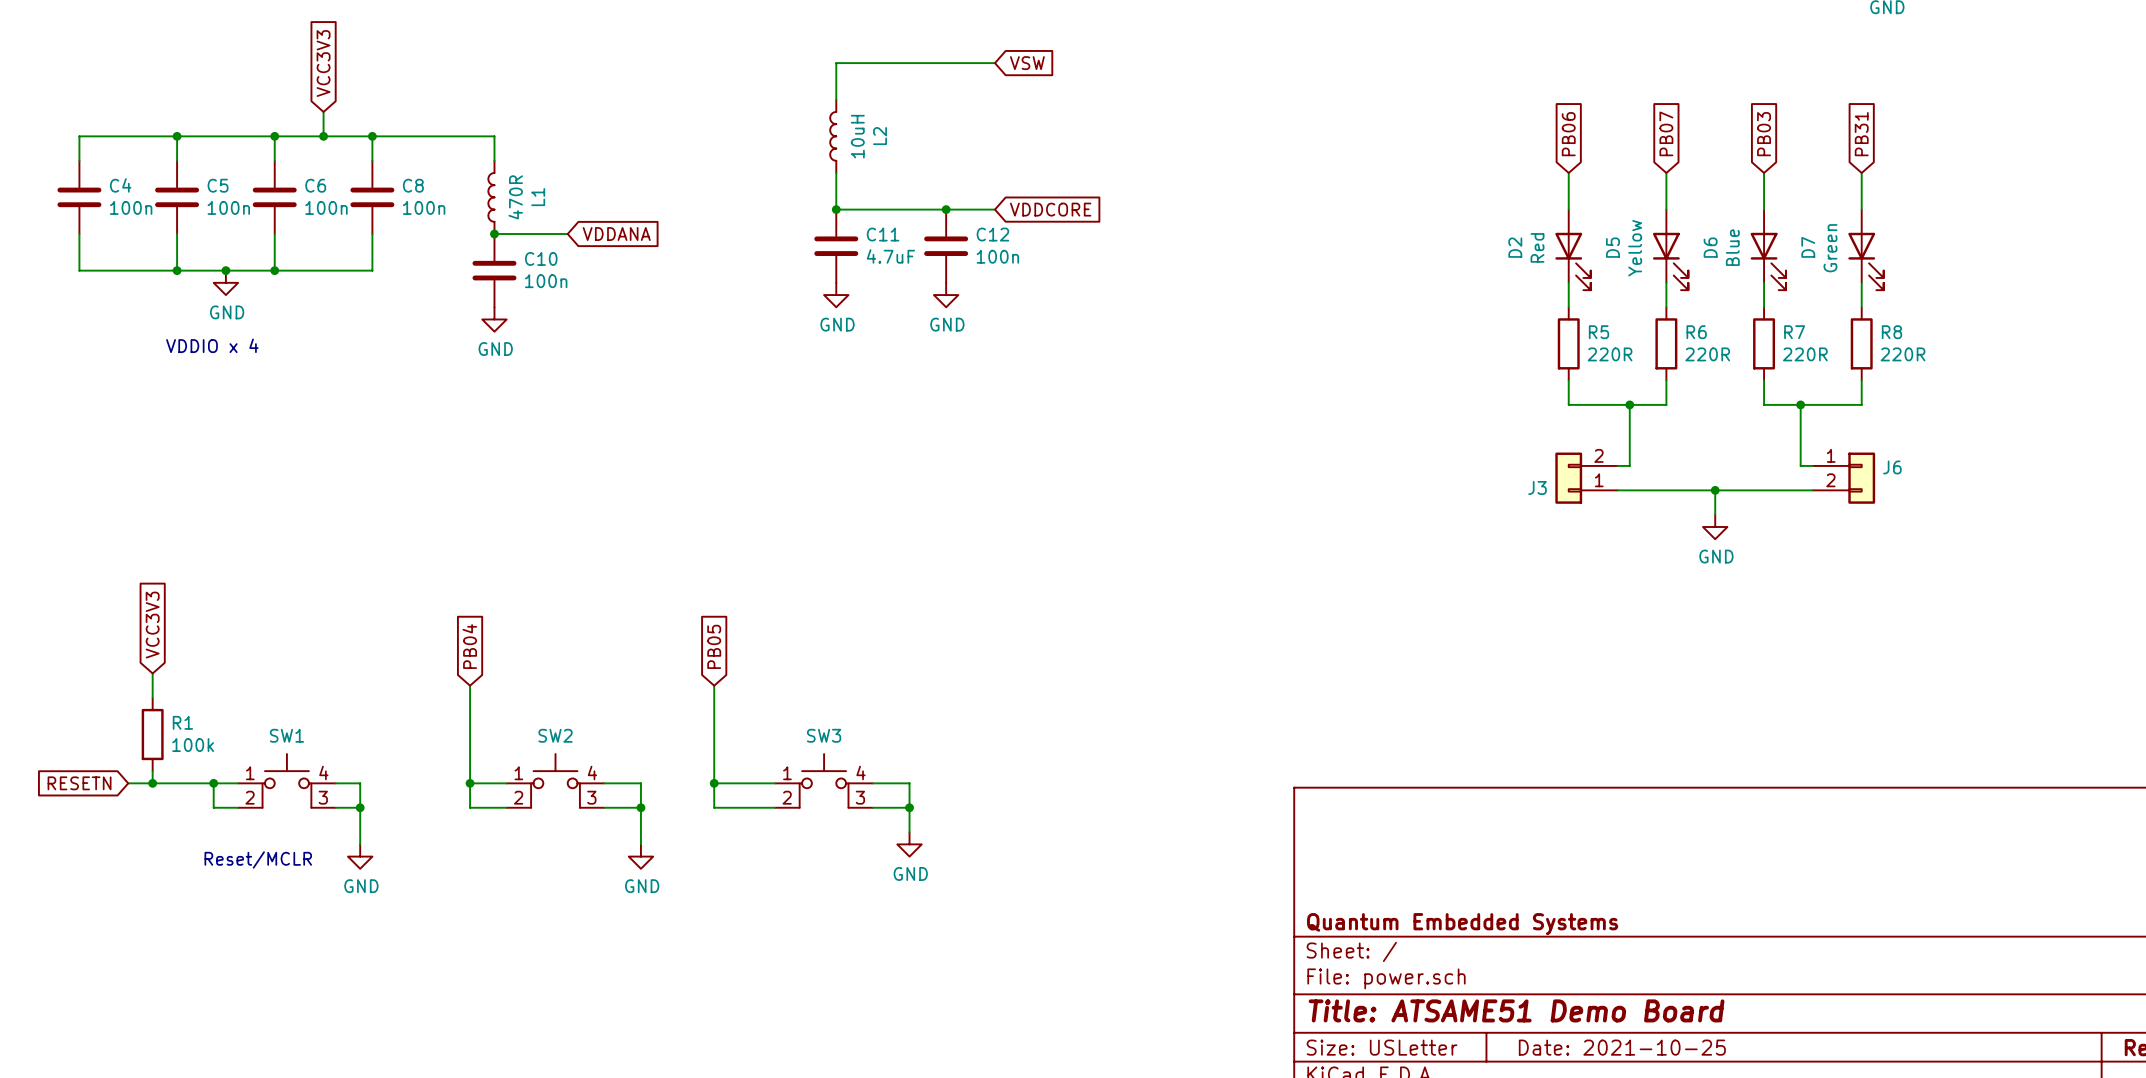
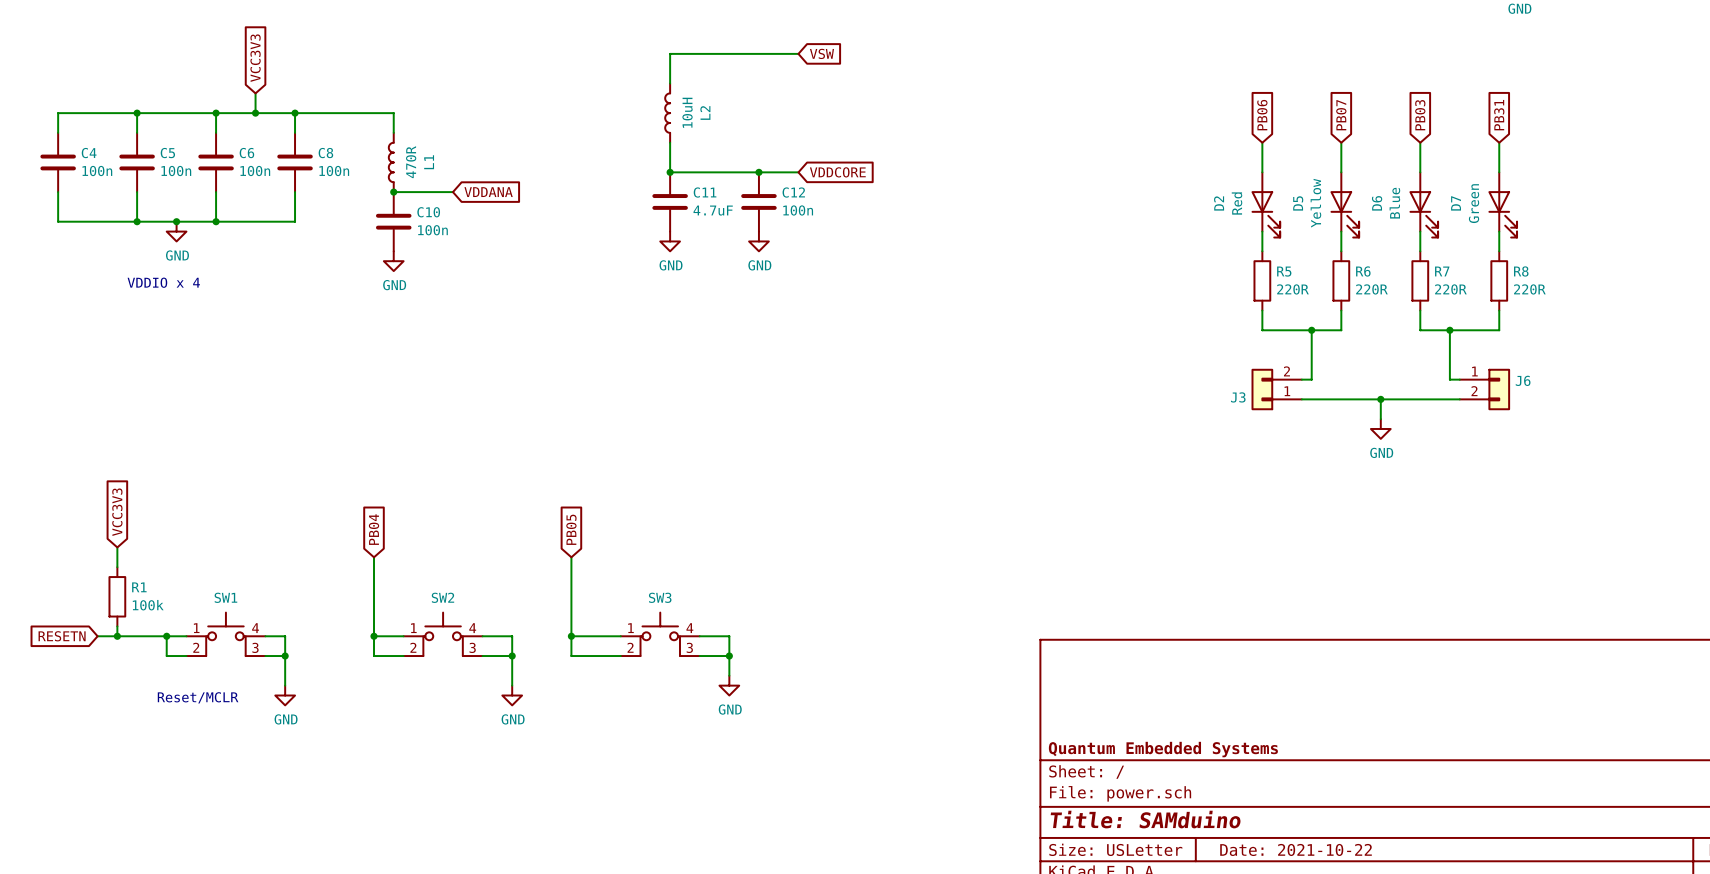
title block: Title: ATSAME51 Demo Board (1516, 1010) -> Title: SAMduino (1145, 819)
title block: Date: 2021-10-25 (1622, 1047) -> Date: 2021-10-22 (1296, 849)

